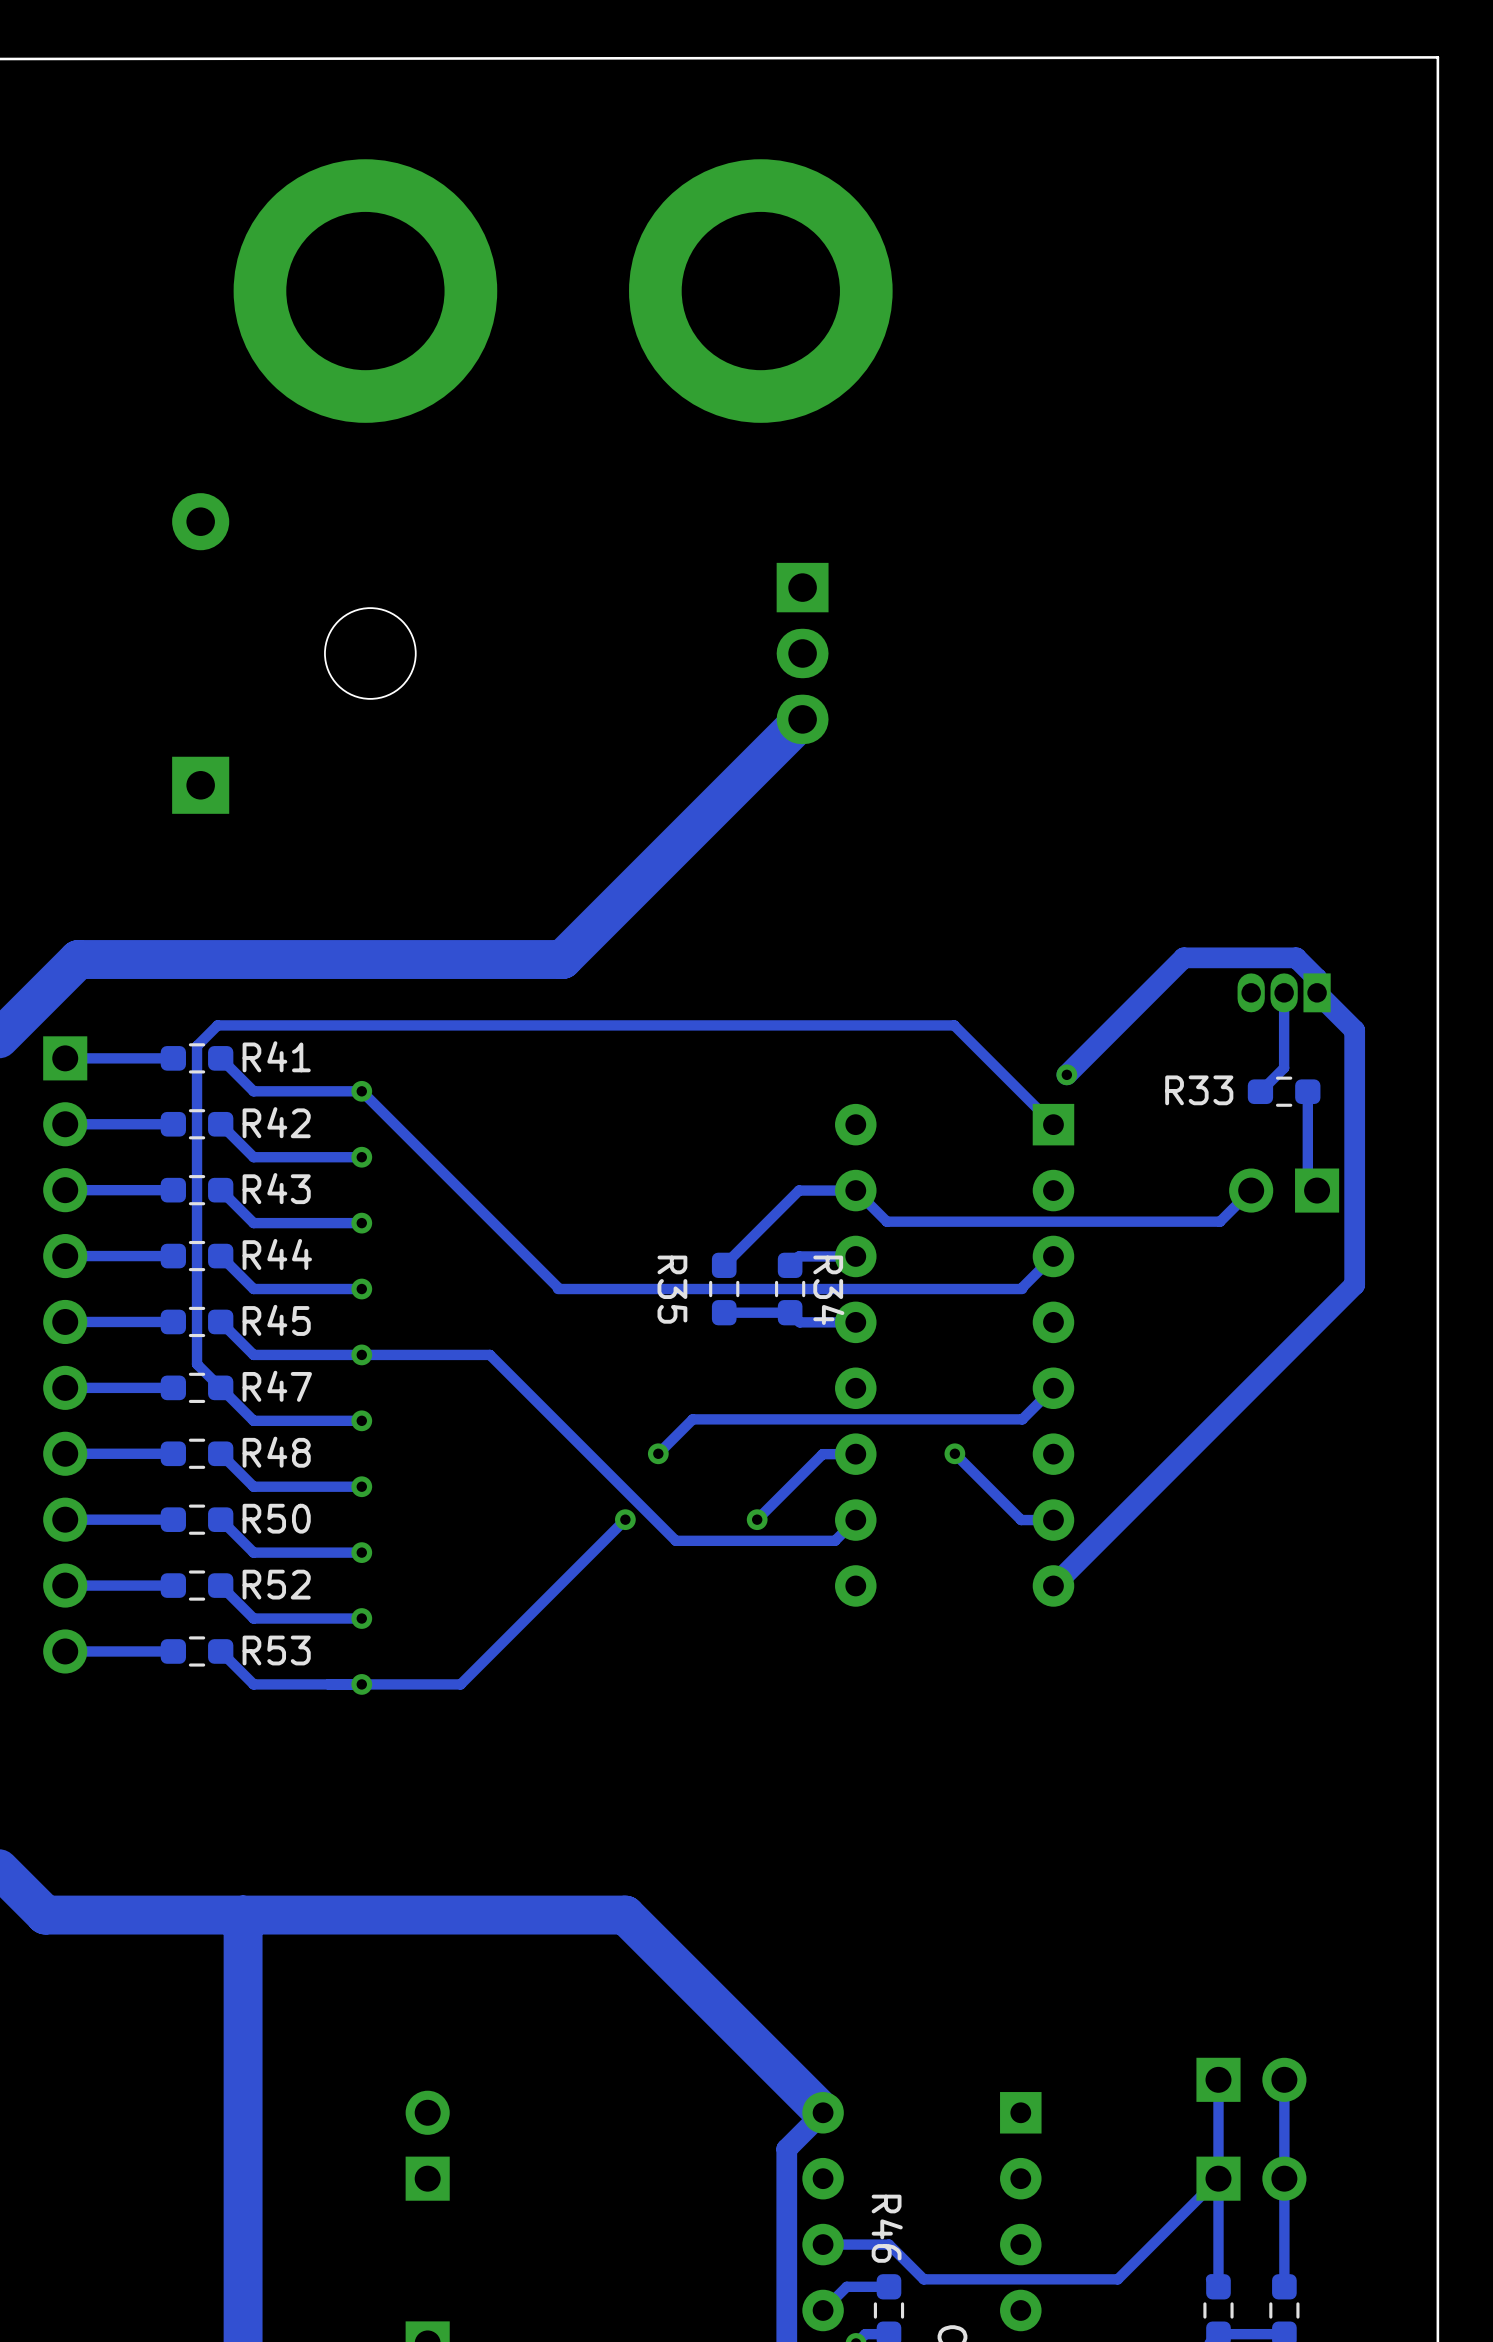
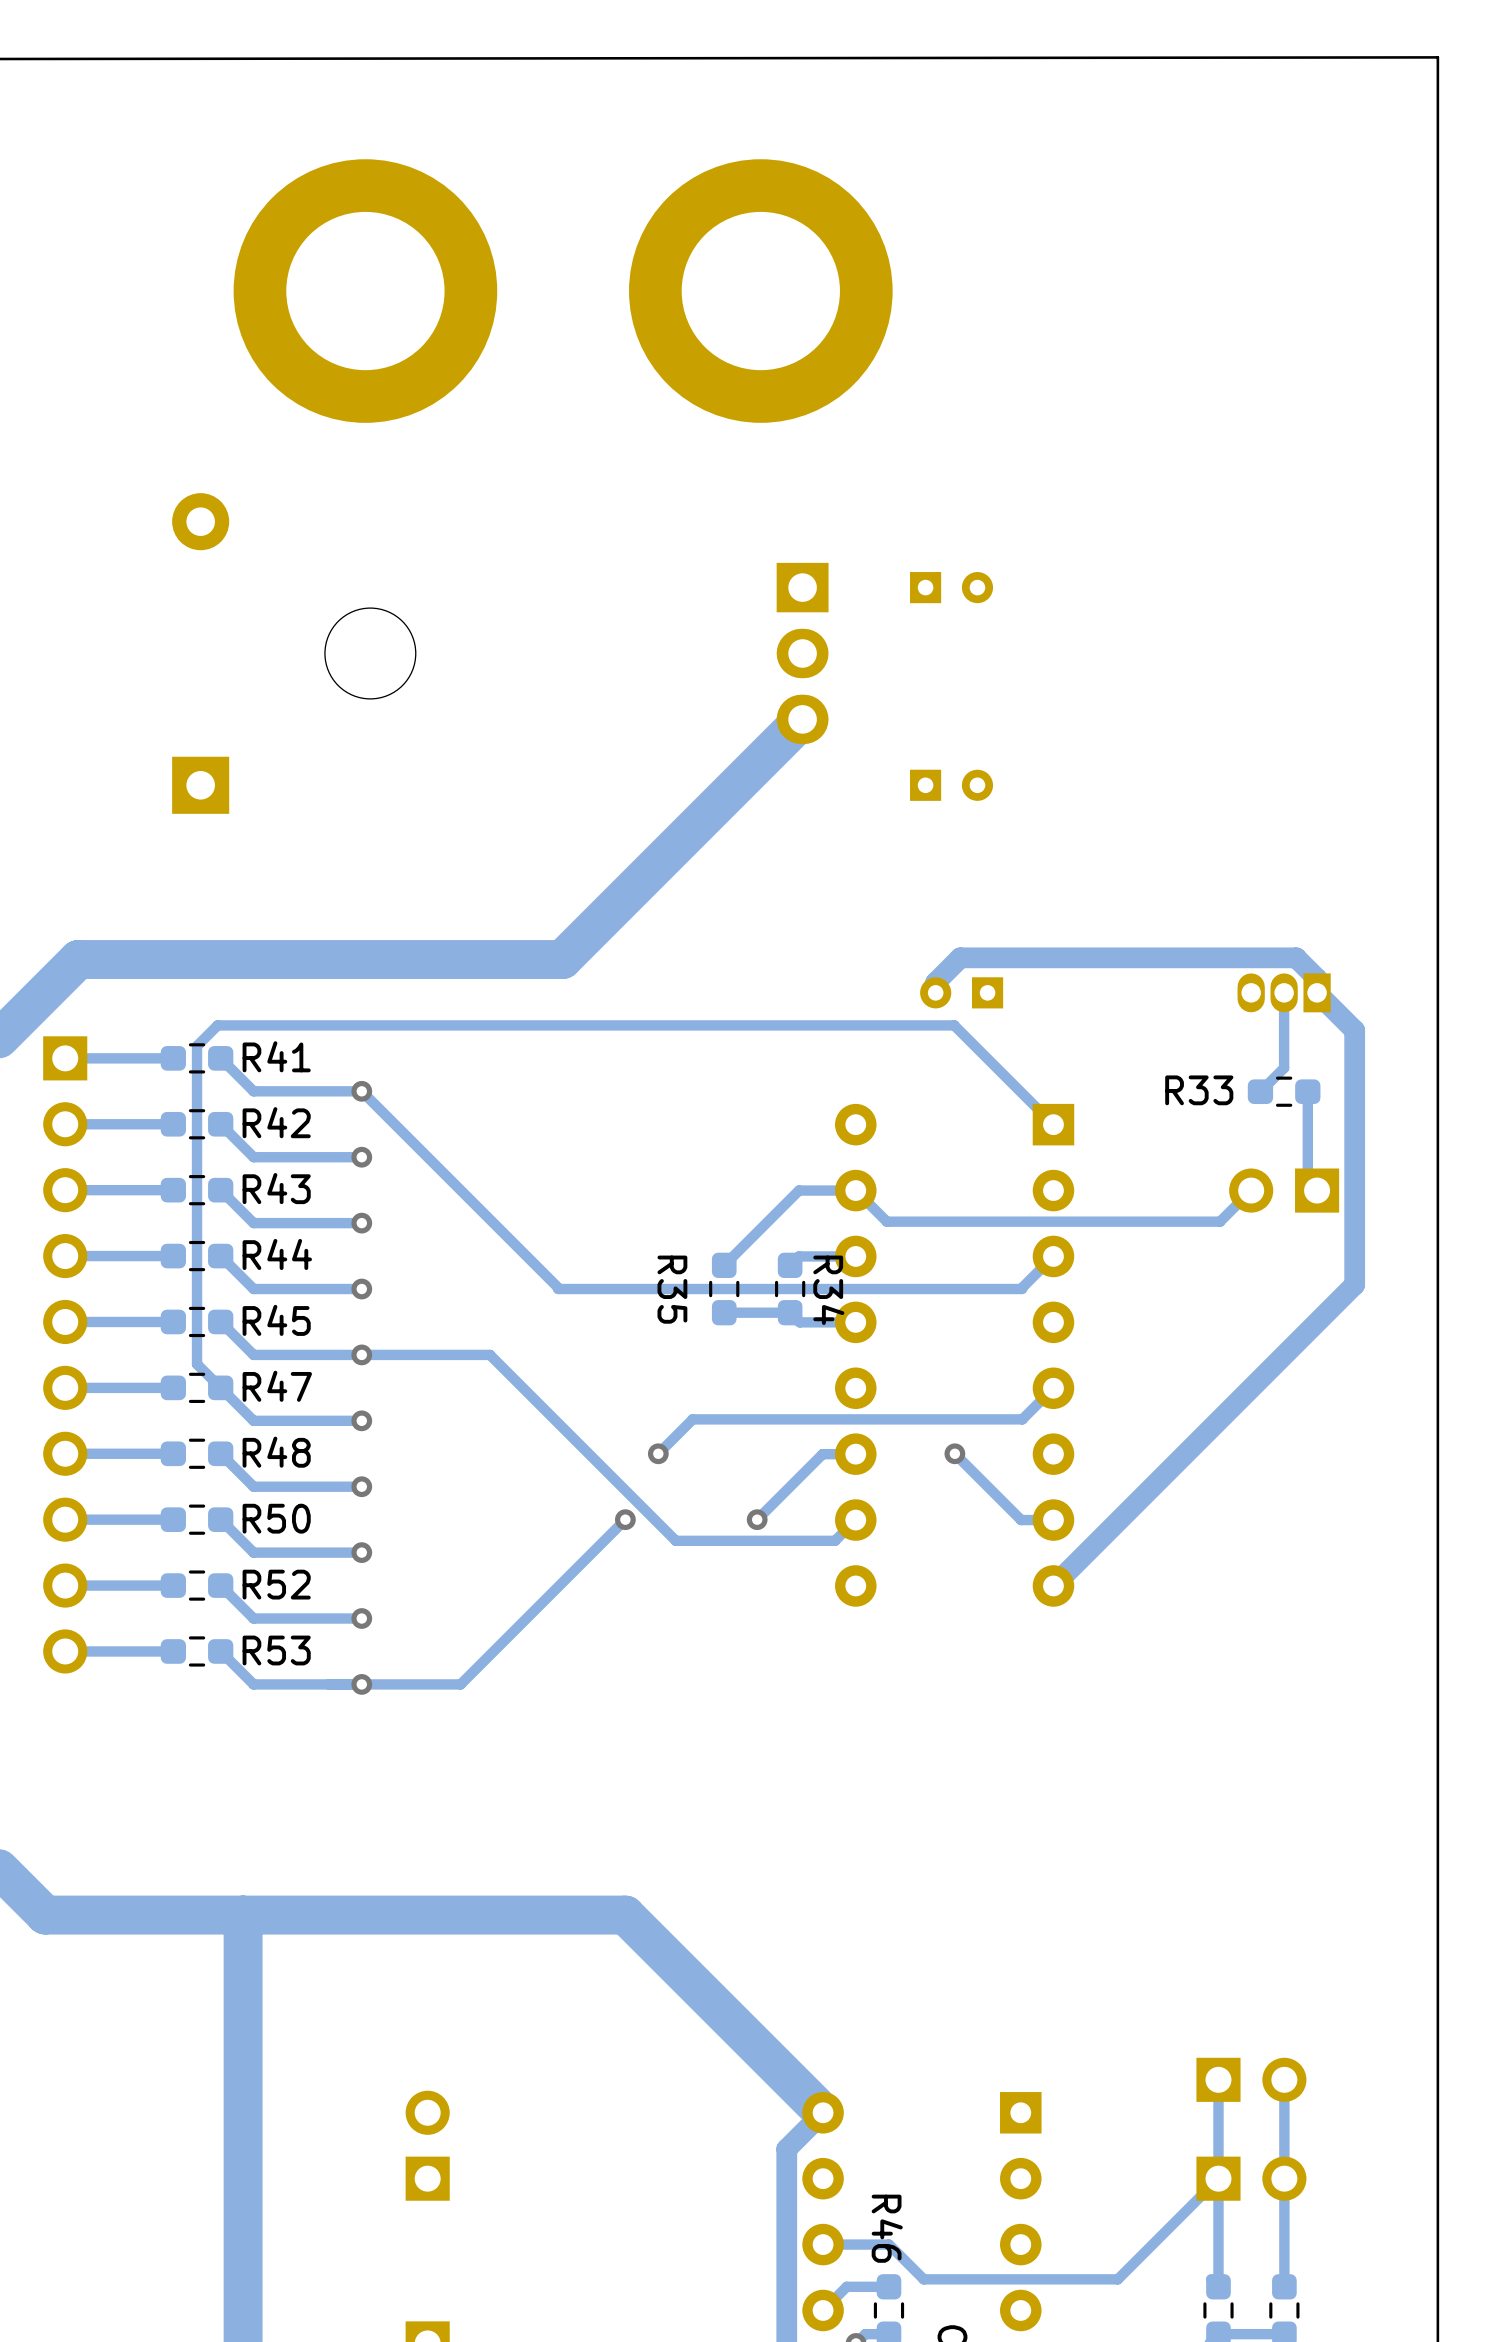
part: none -> (951, 587)
part: none -> (951, 785)
track: (1183, 957) (1066, 1074) -> (1183, 957) (960, 957) (935, 982) (935, 992)
part: none -> (961, 992)
via: (1066, 1074) -> none

